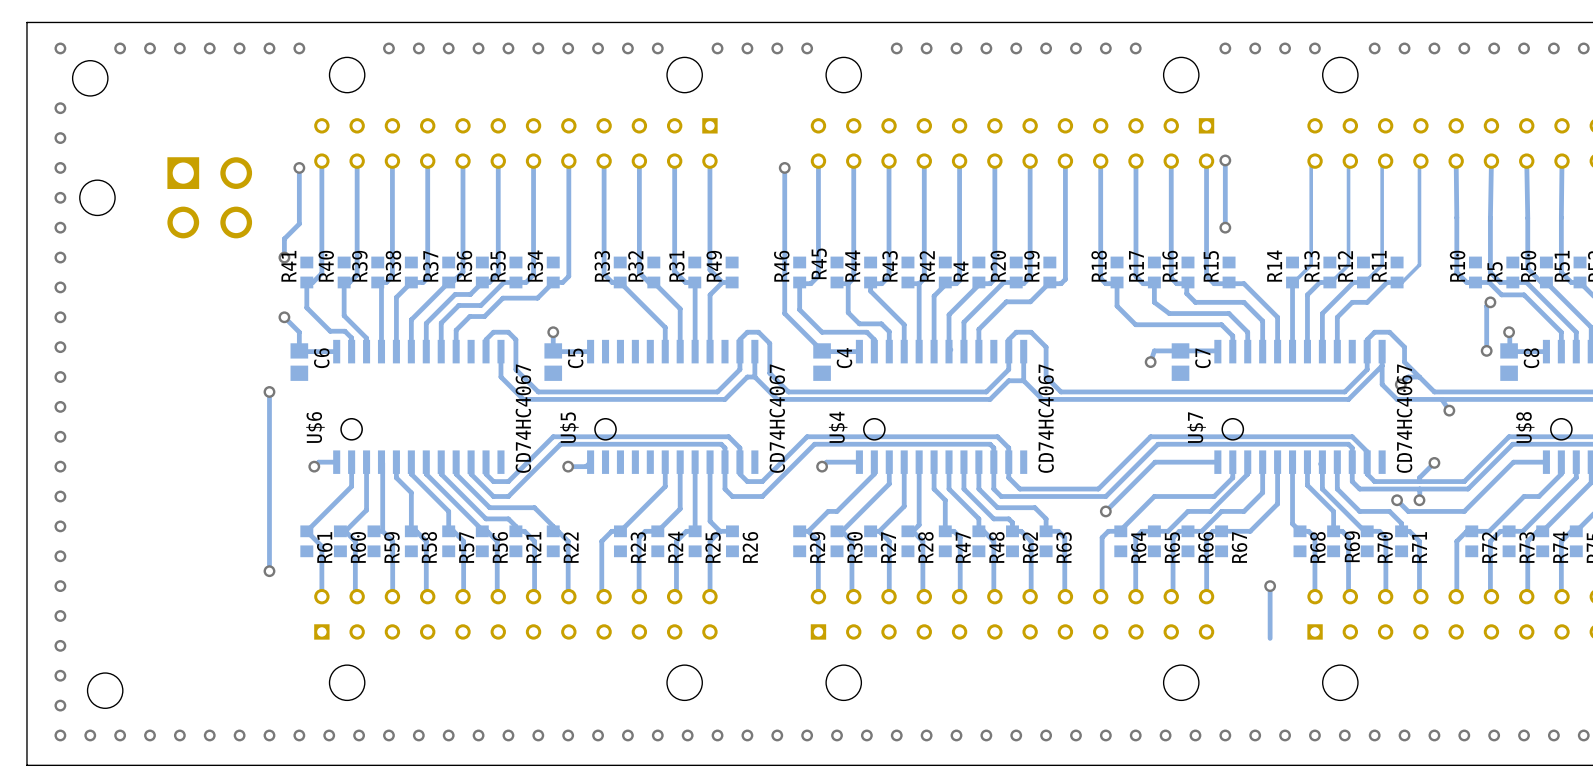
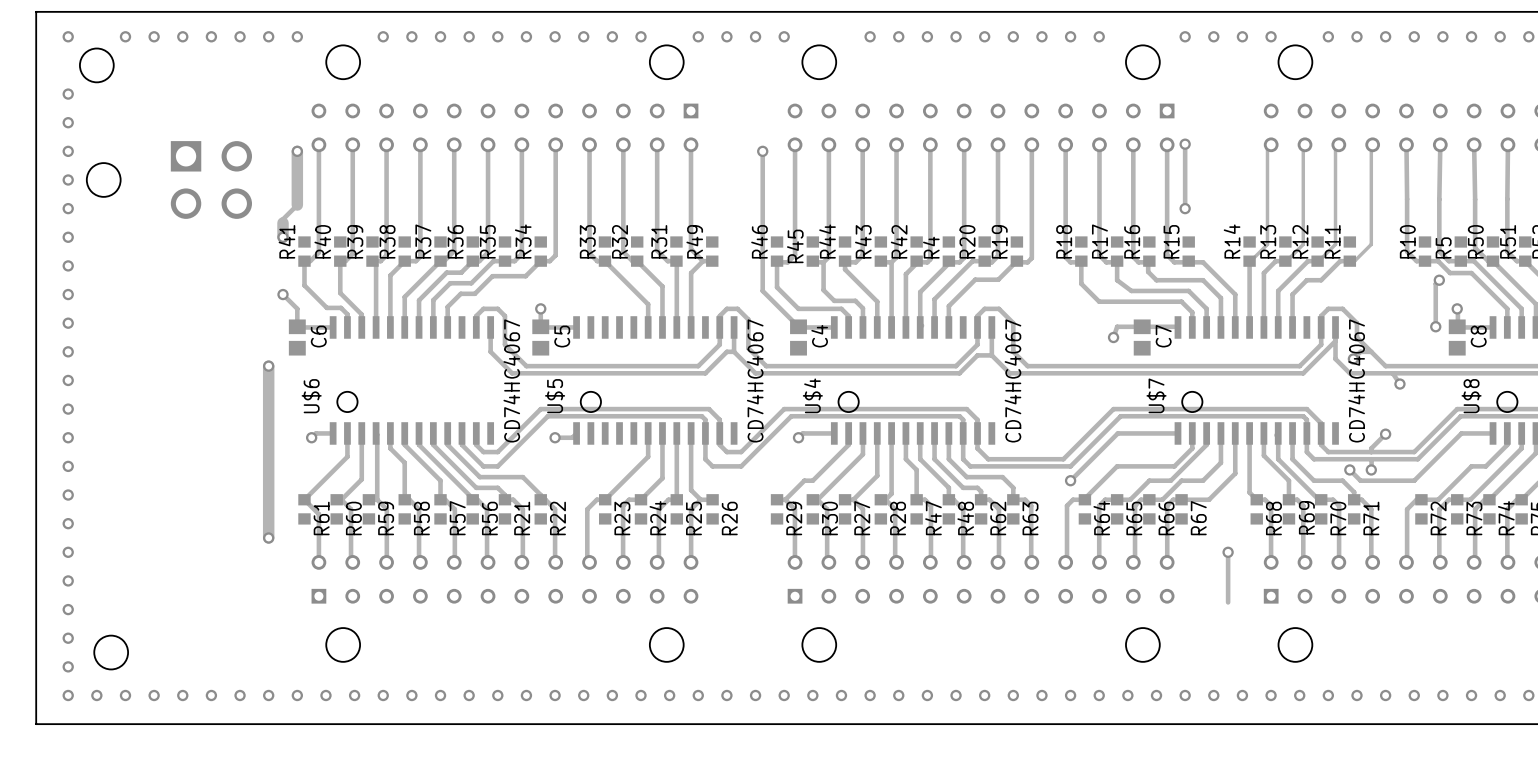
track width: thin (299, 167) (299, 223) -> thick (297, 151) (297, 205)
track width: thin (284, 242) (284, 257) -> thick (283, 222) (283, 237)
track width: thin (269, 391) (269, 571) -> thick (268, 366) (268, 537)

